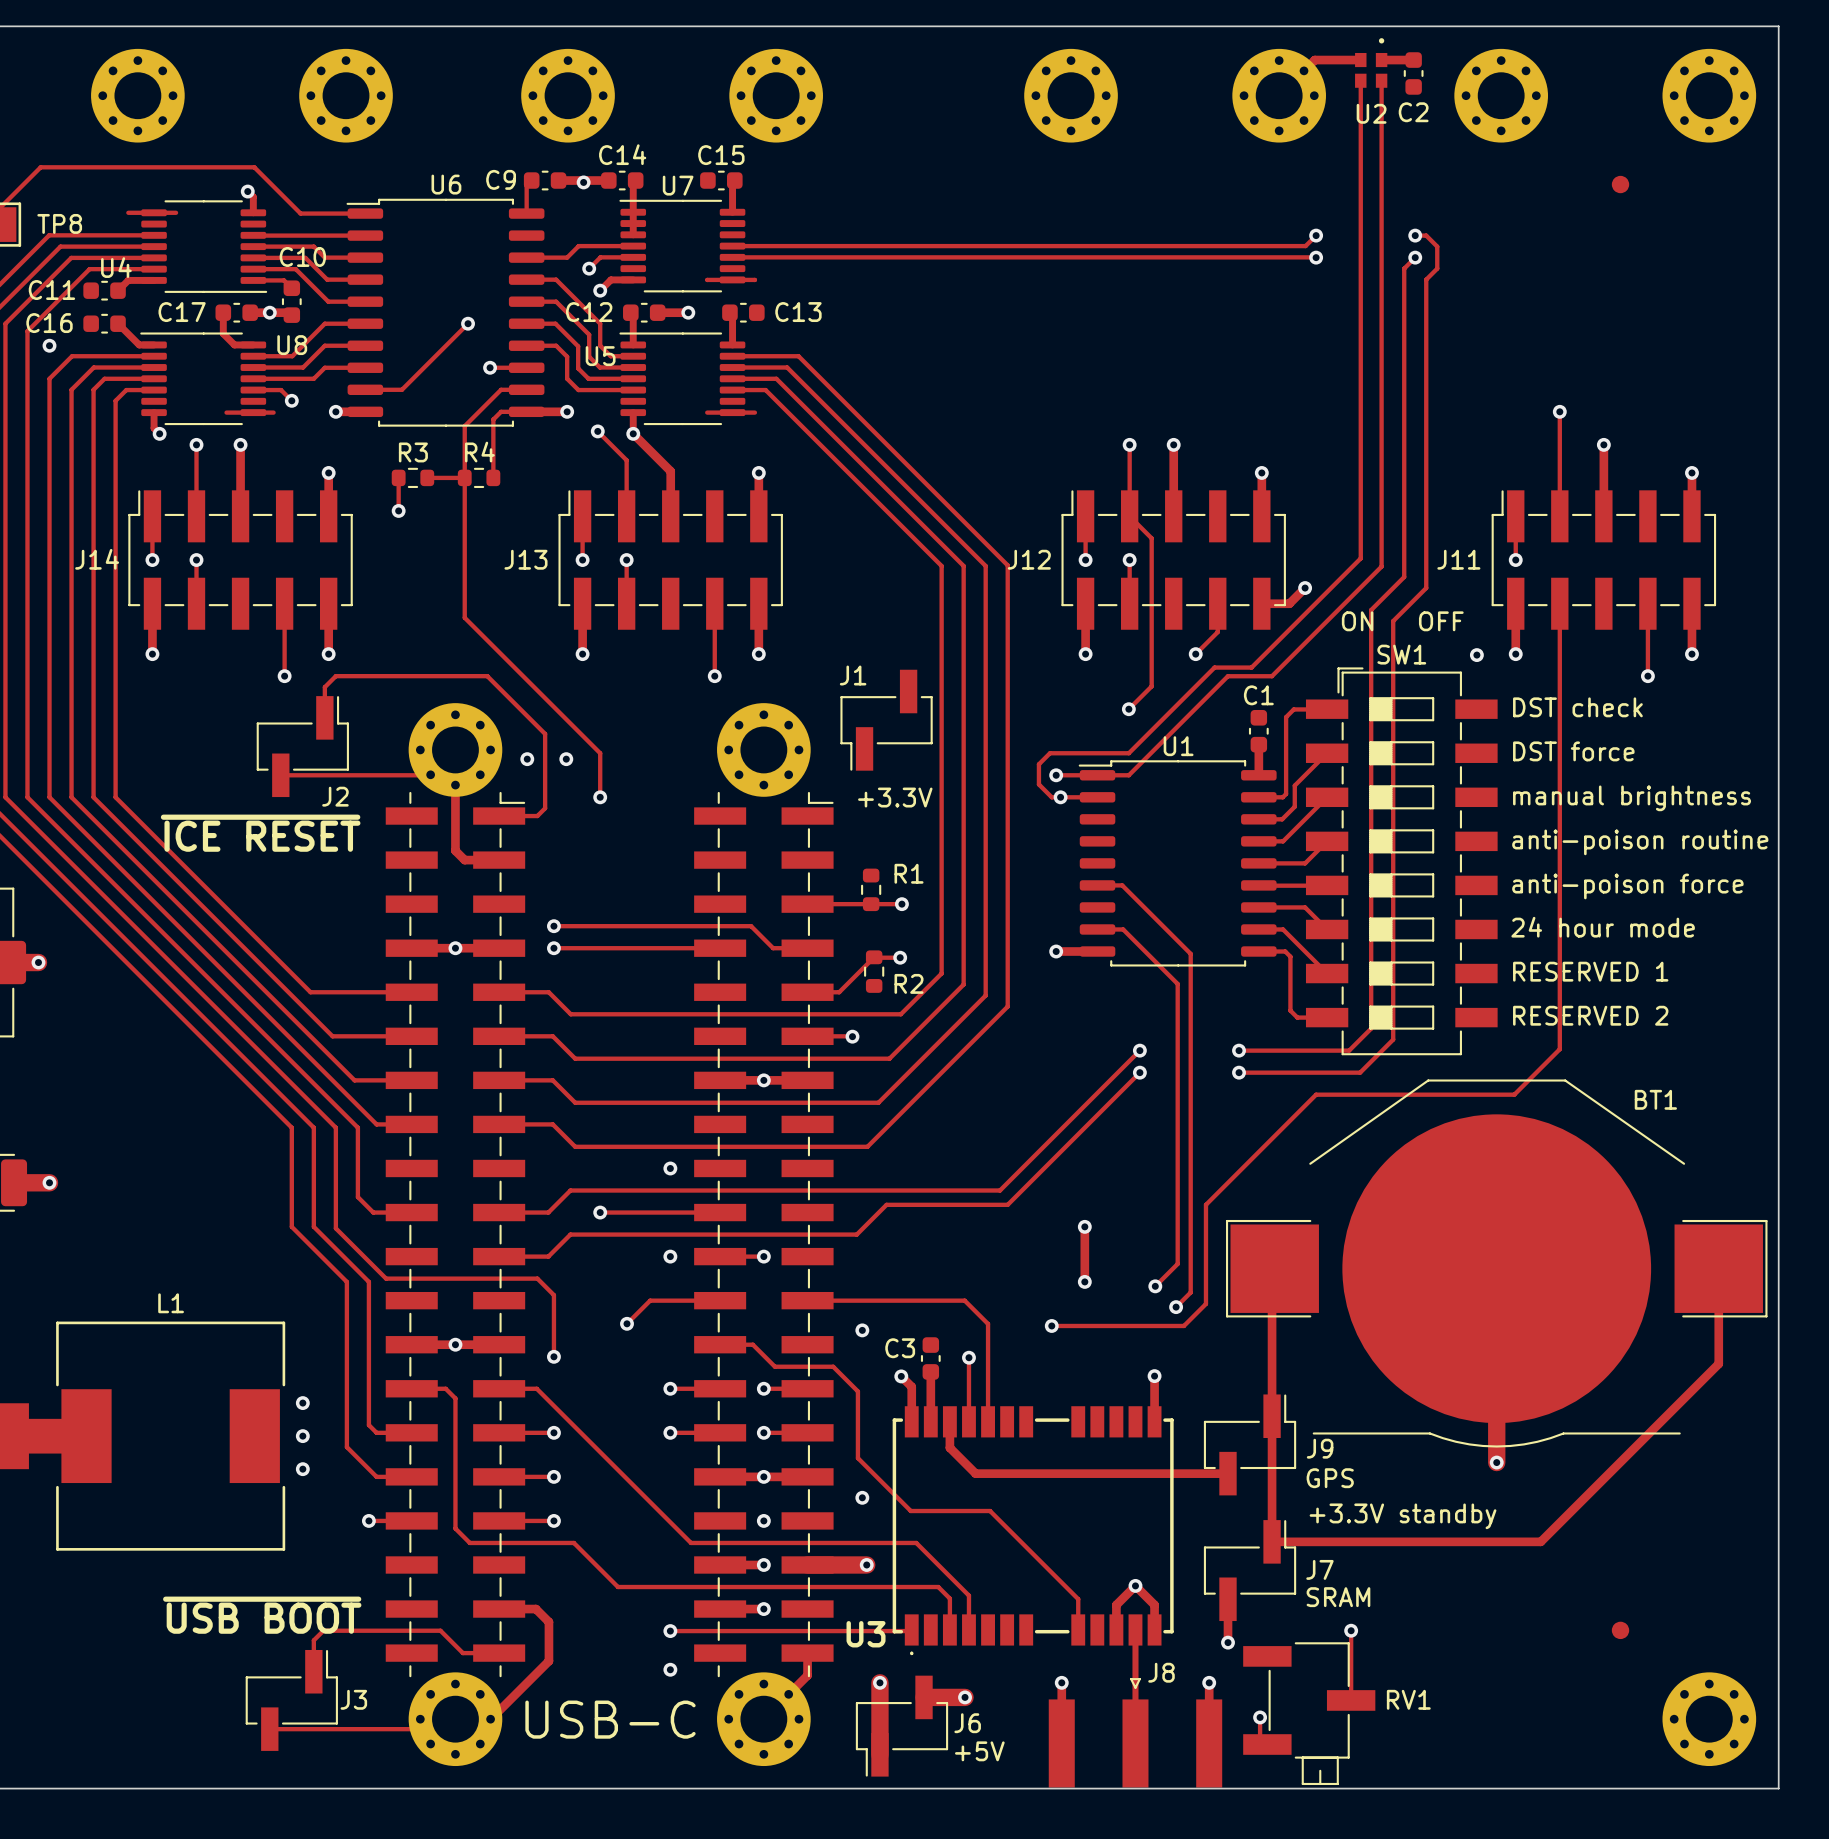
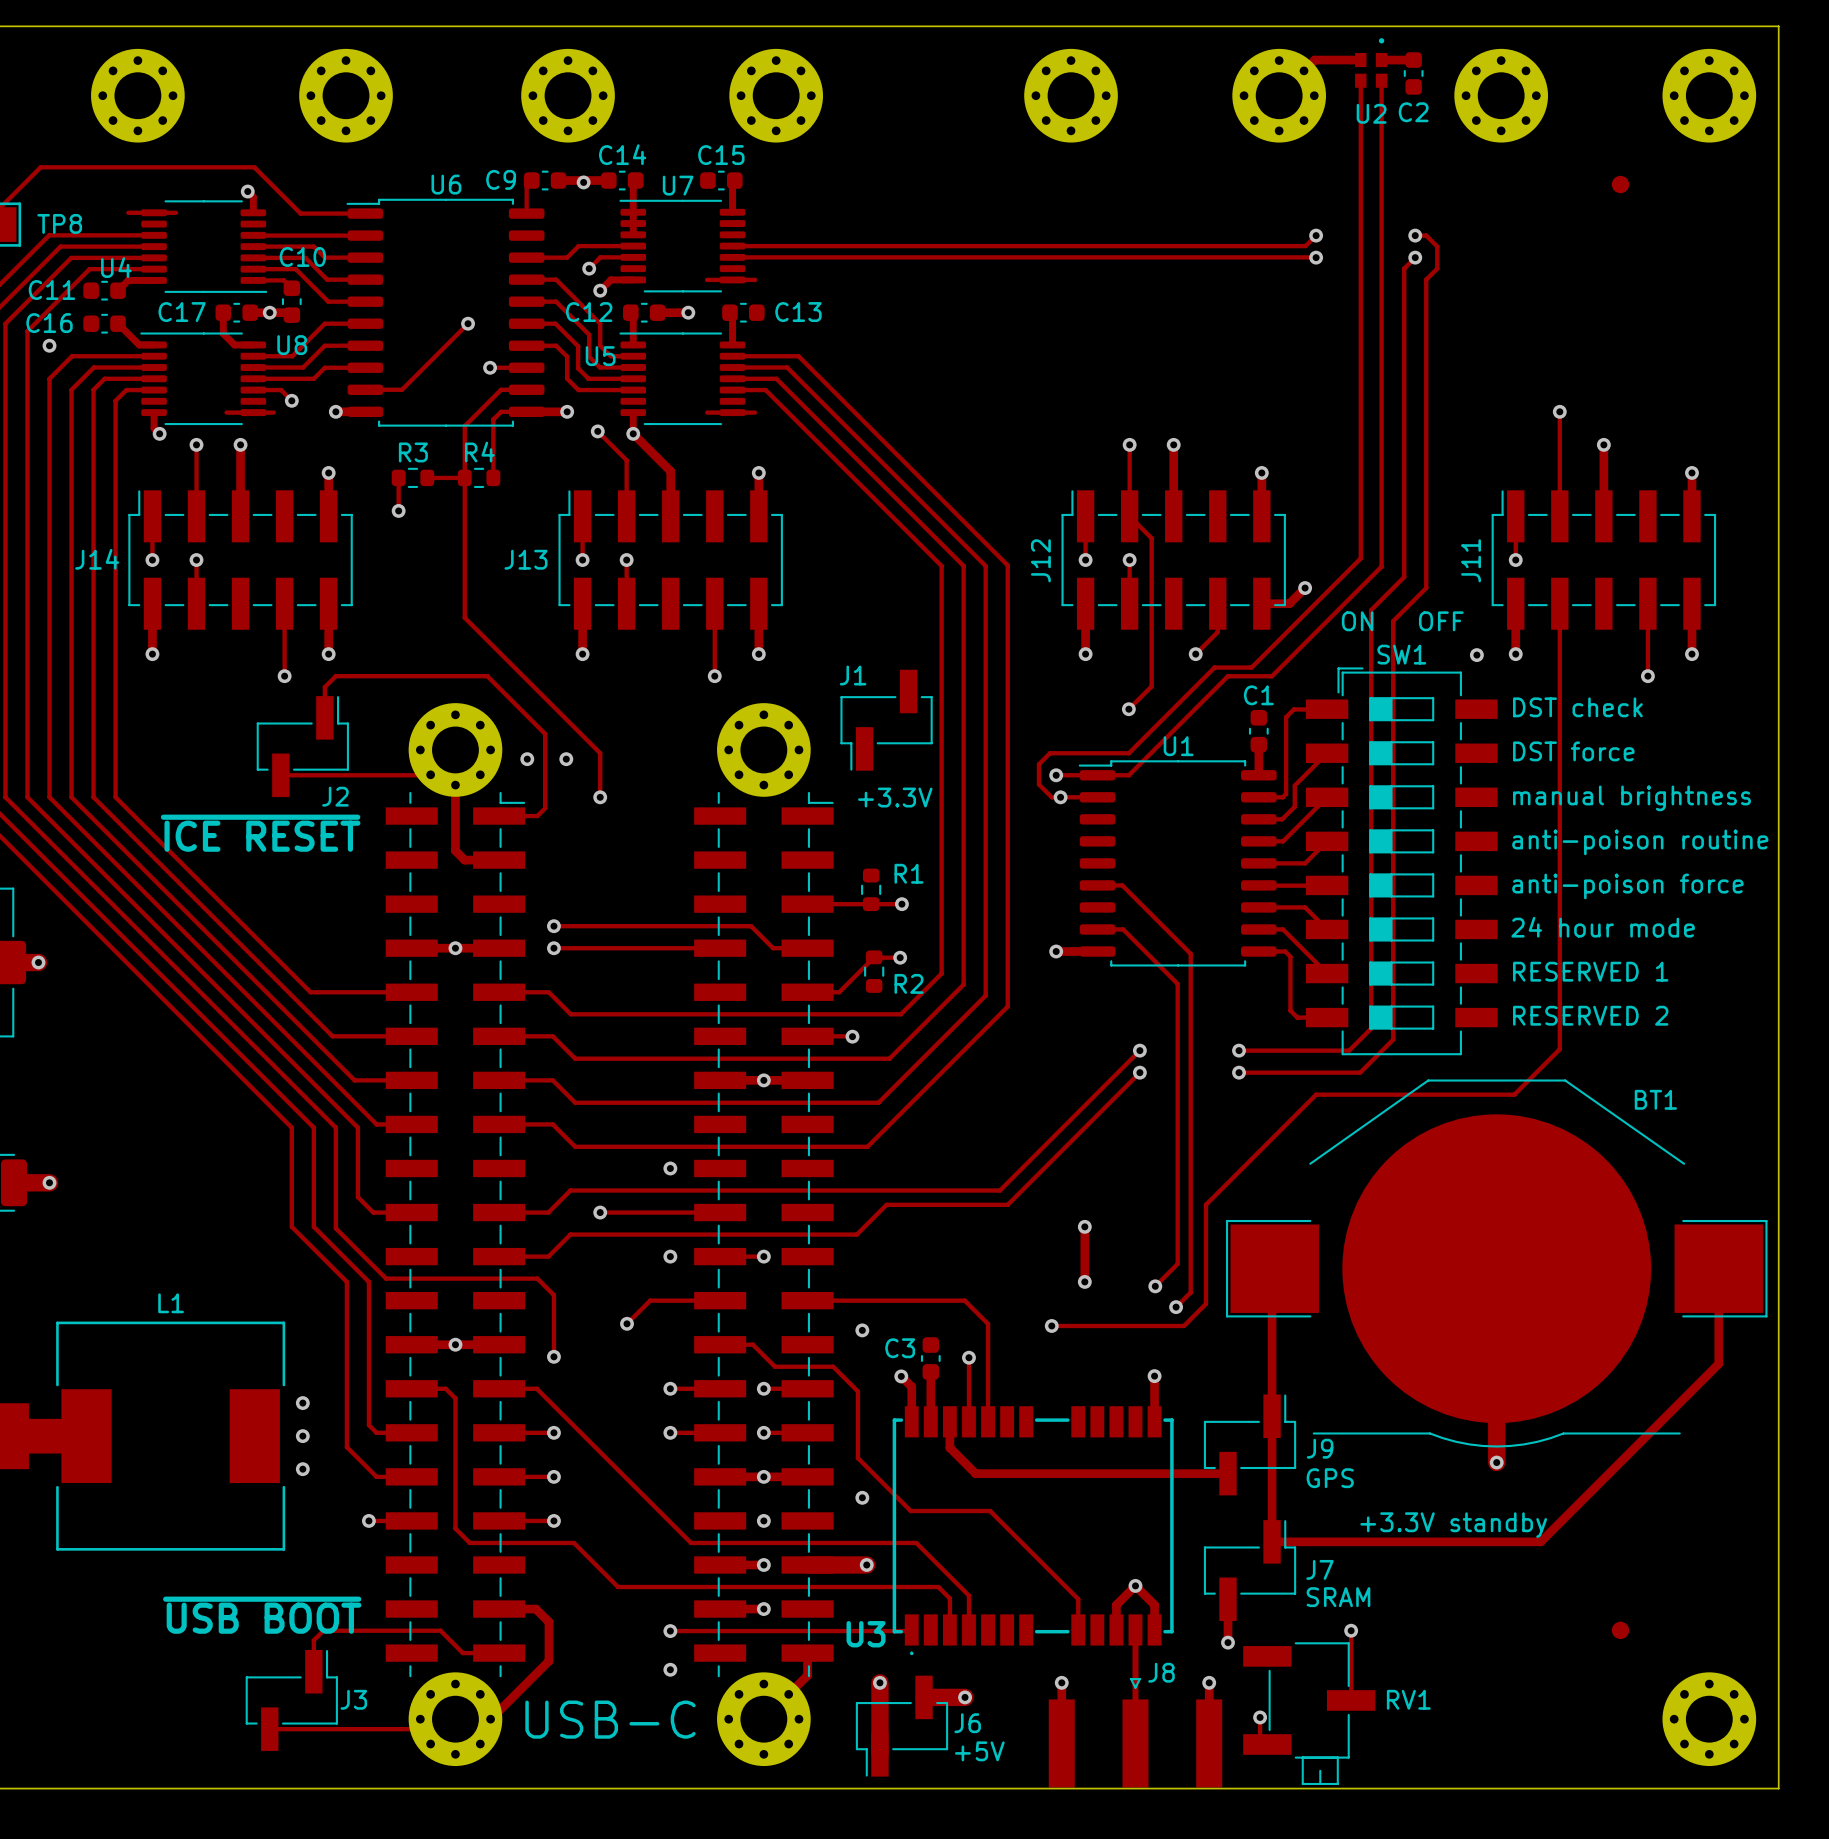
J12 name rotation: 0° (1029, 559) -> 90° counterclockwise (1040, 560)
J11 name rotation: 0° (1458, 559) -> 90° counterclockwise (1471, 560)
text position: +3.3V standby (1403, 1516) -> +3.3V standby (1453, 1525)

